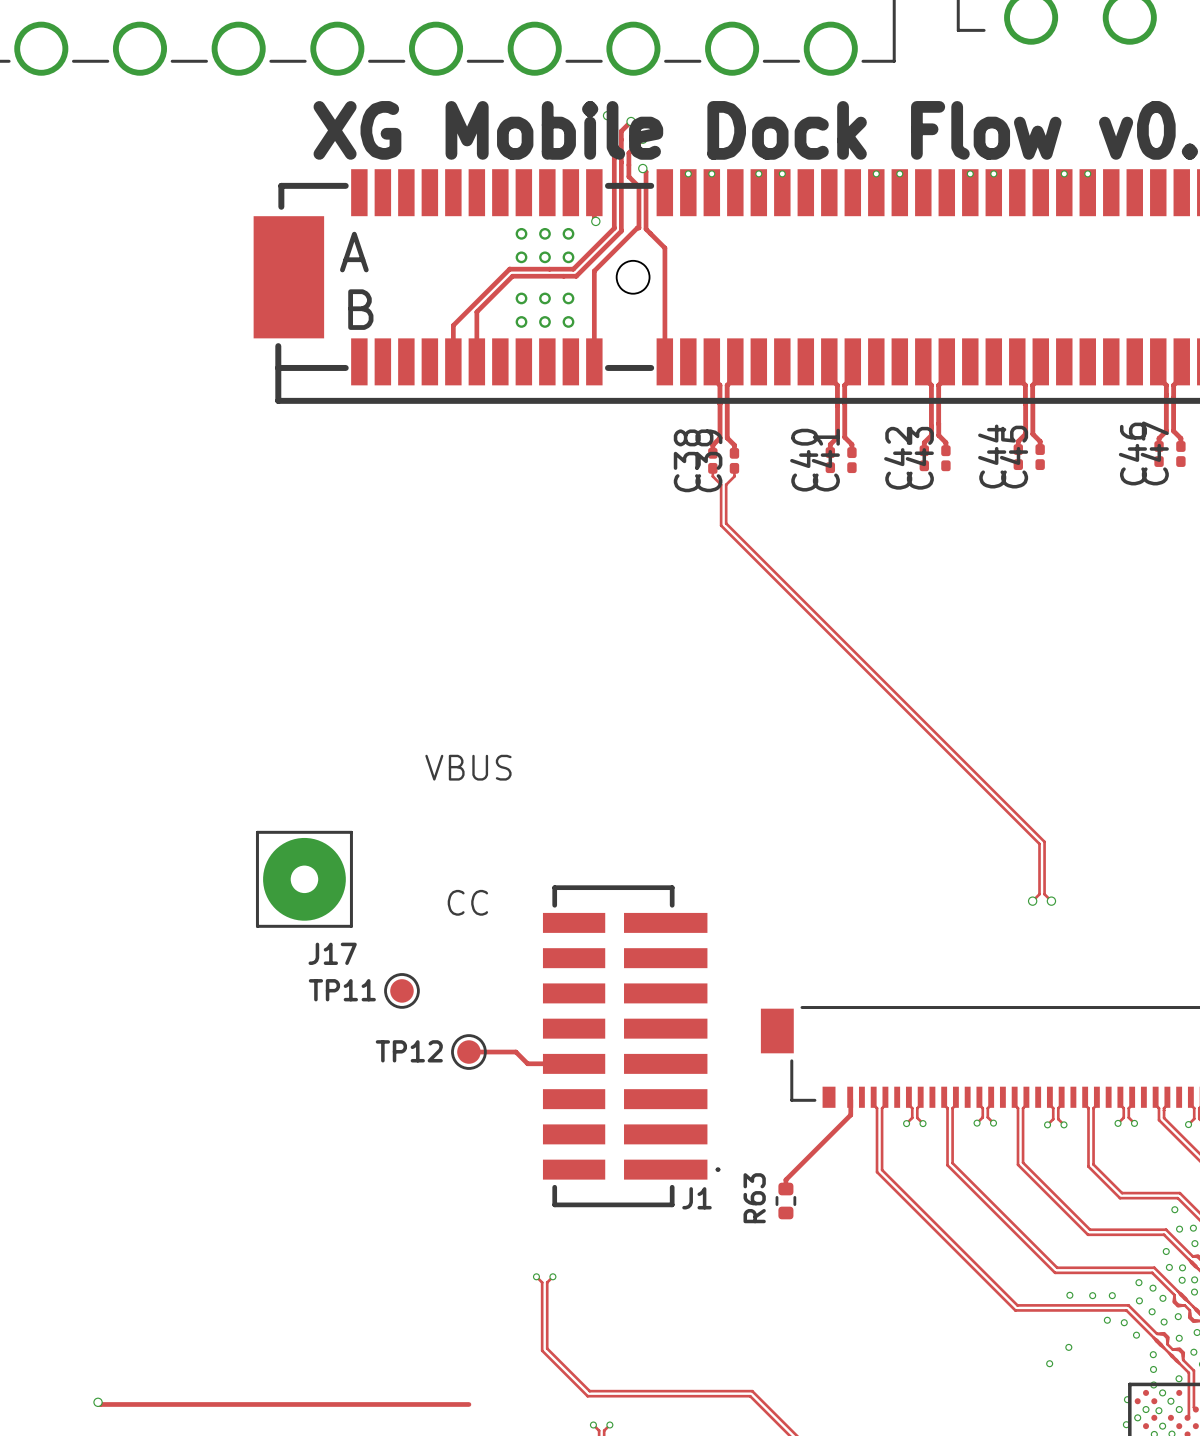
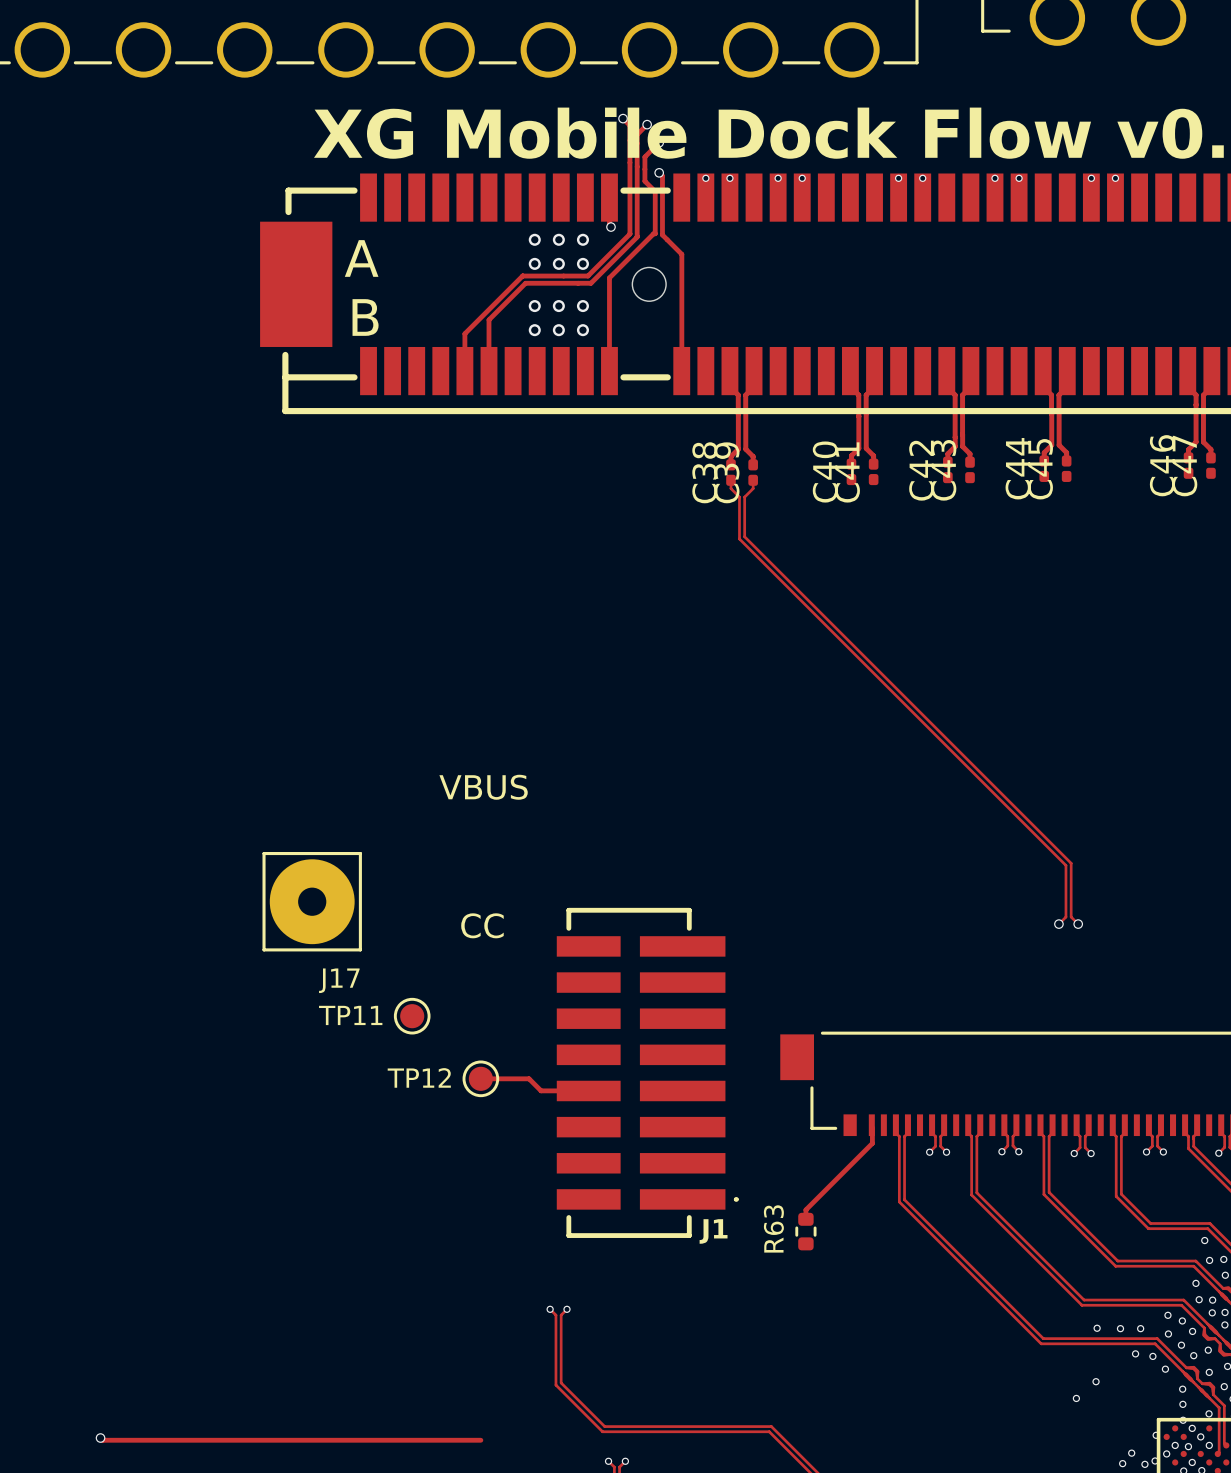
via: none -> (1131, 1453)
via: none -> (1122, 1463)
via: none -> (1144, 1464)

